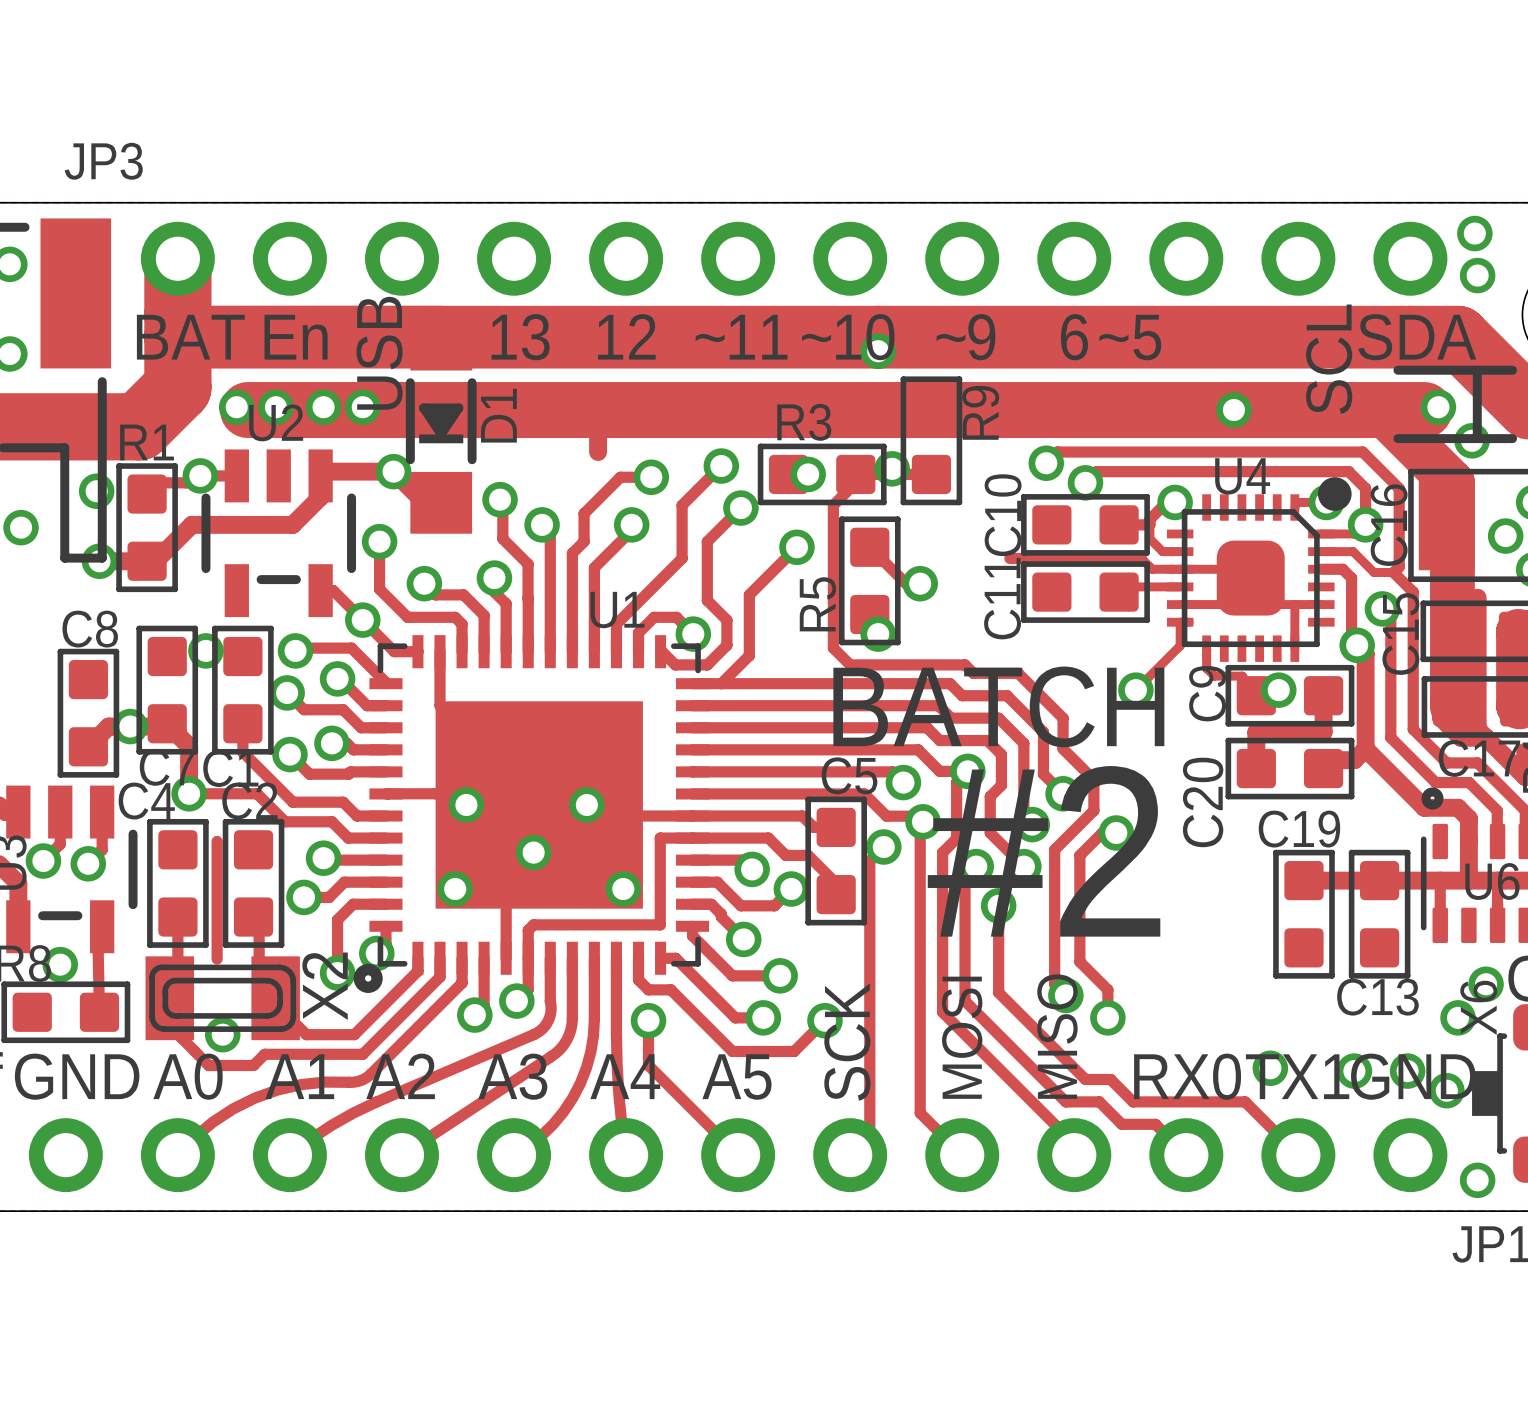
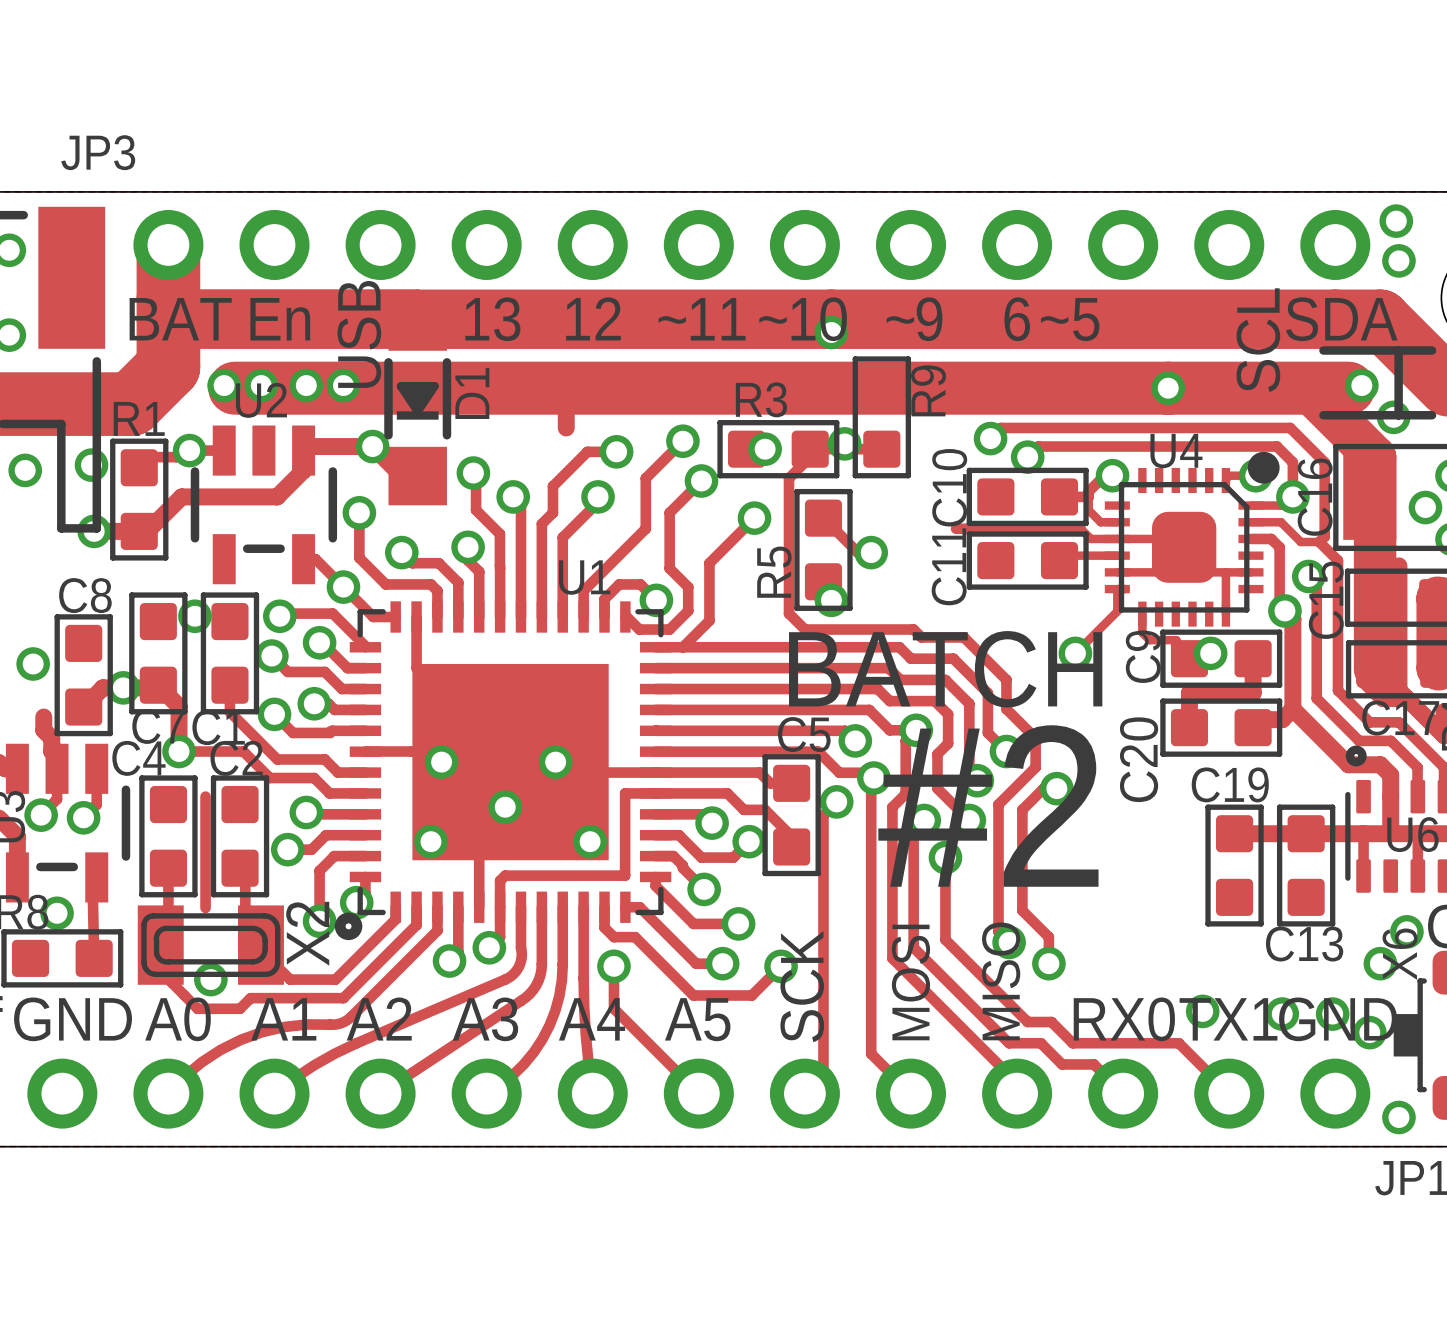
via position: (21, 527) -> (25, 470)
via: none -> (33, 663)
track: none -> (43, 717) (43, 730) (51, 738) (51, 751) (57, 751) (57, 768)

